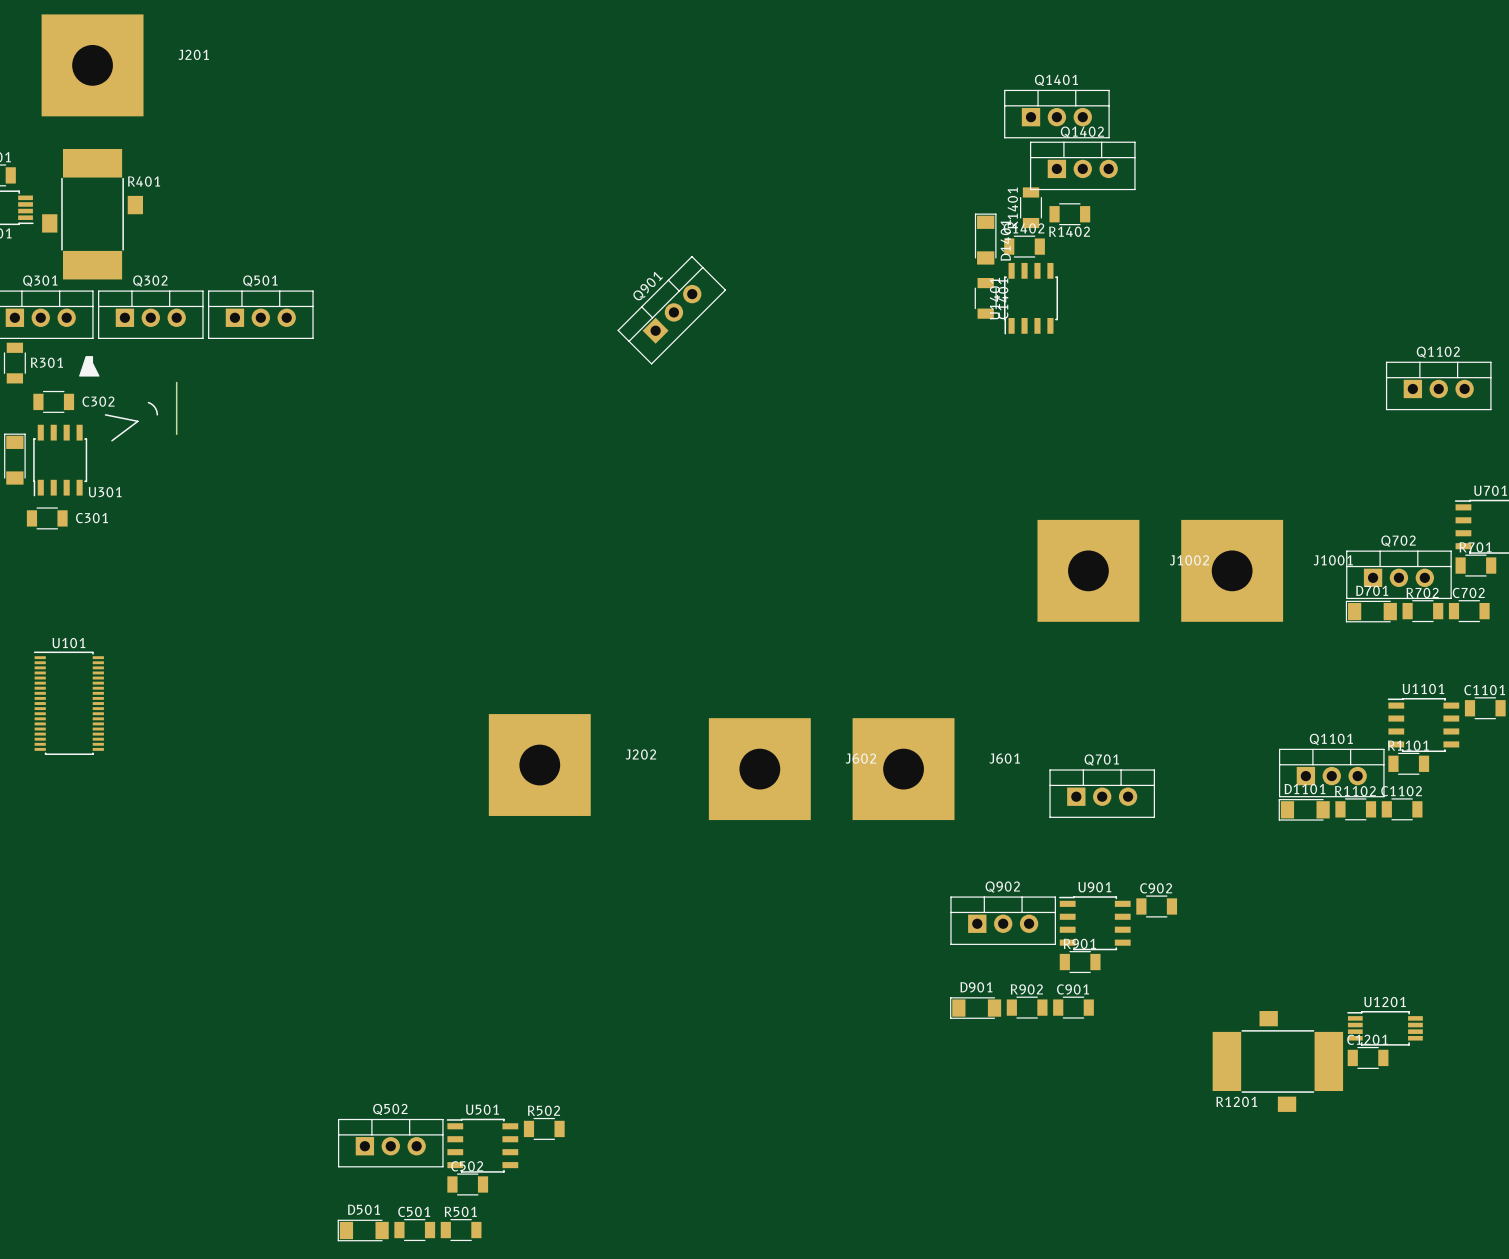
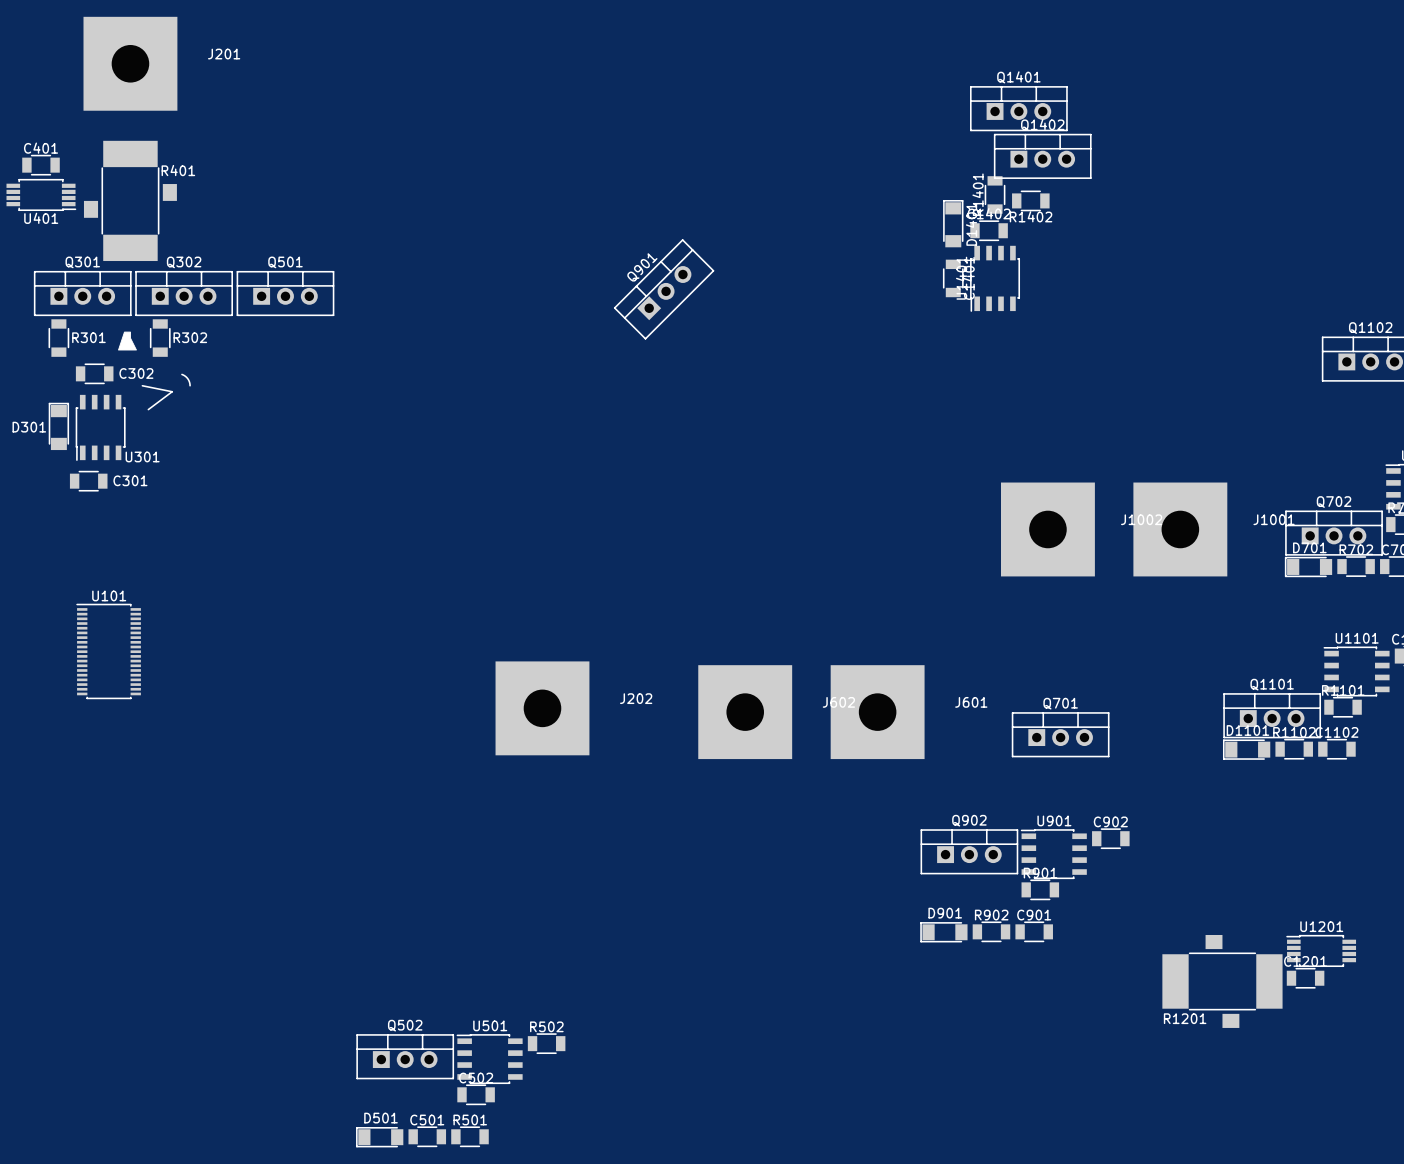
R302: none -> (160, 338)
board edge: (176, 382) (176, 434) -> none

